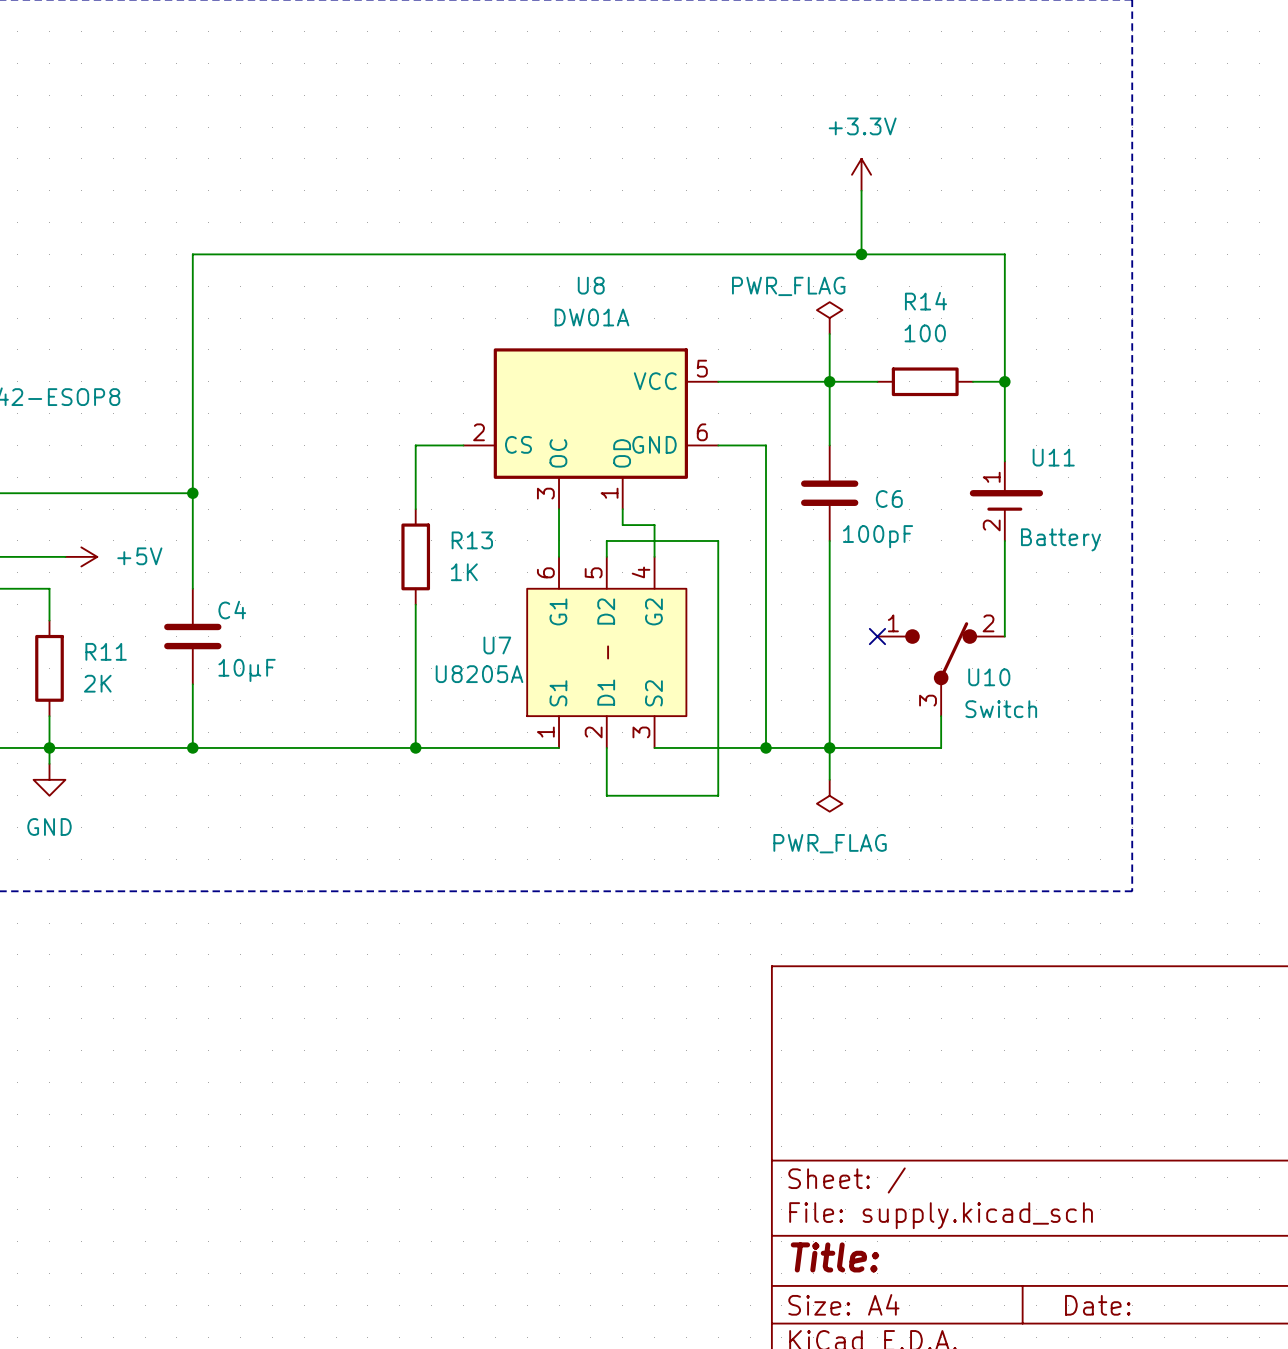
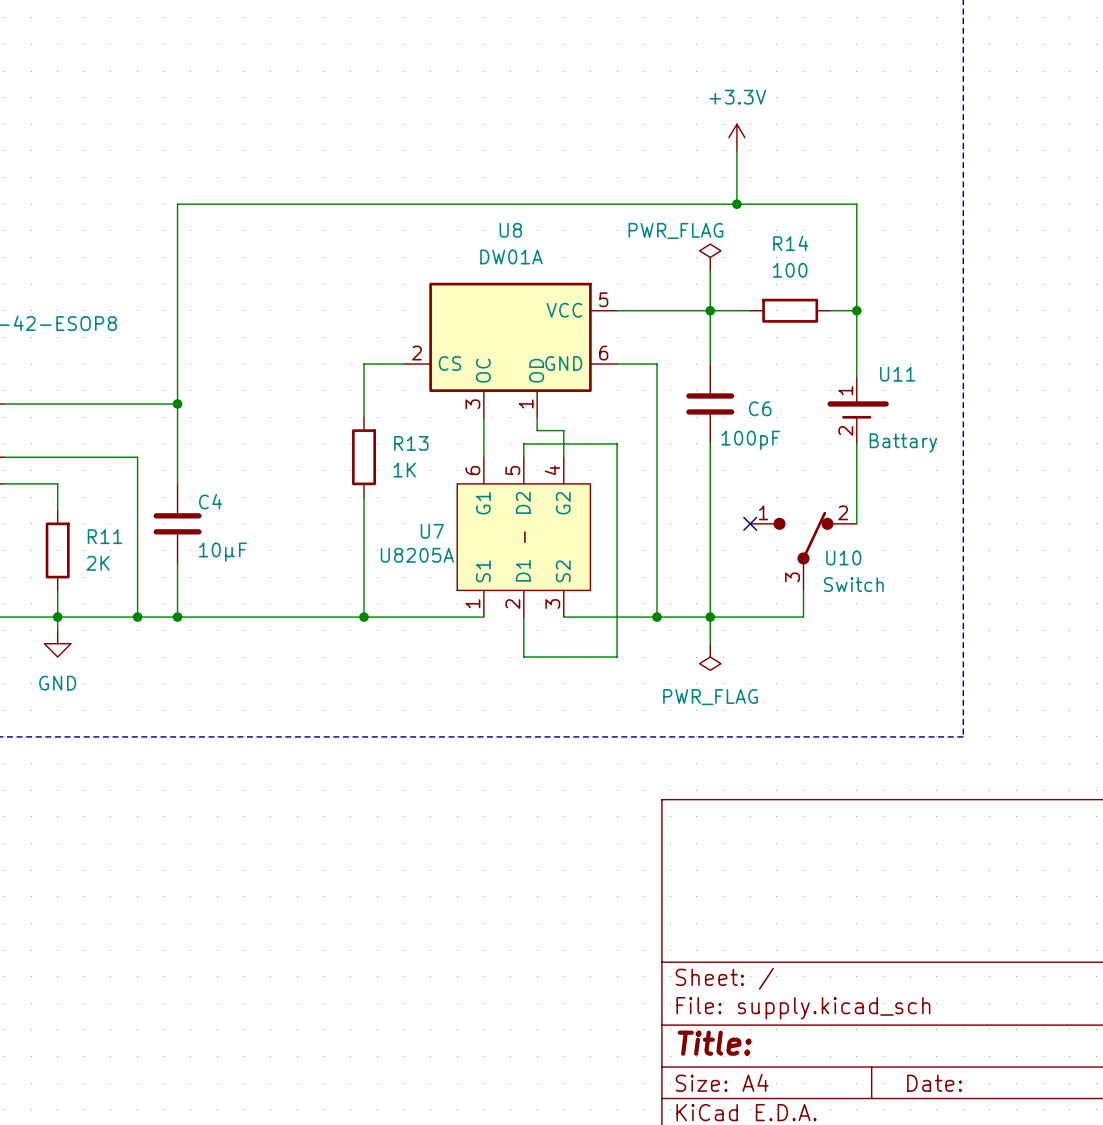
U11 value: Battery (1060, 539) -> Battary (903, 442)
wire: none -> (71, 457) (137, 457) (137, 617)
power symbol: +5V (81, 556) -> none
junction: none -> (137, 617)

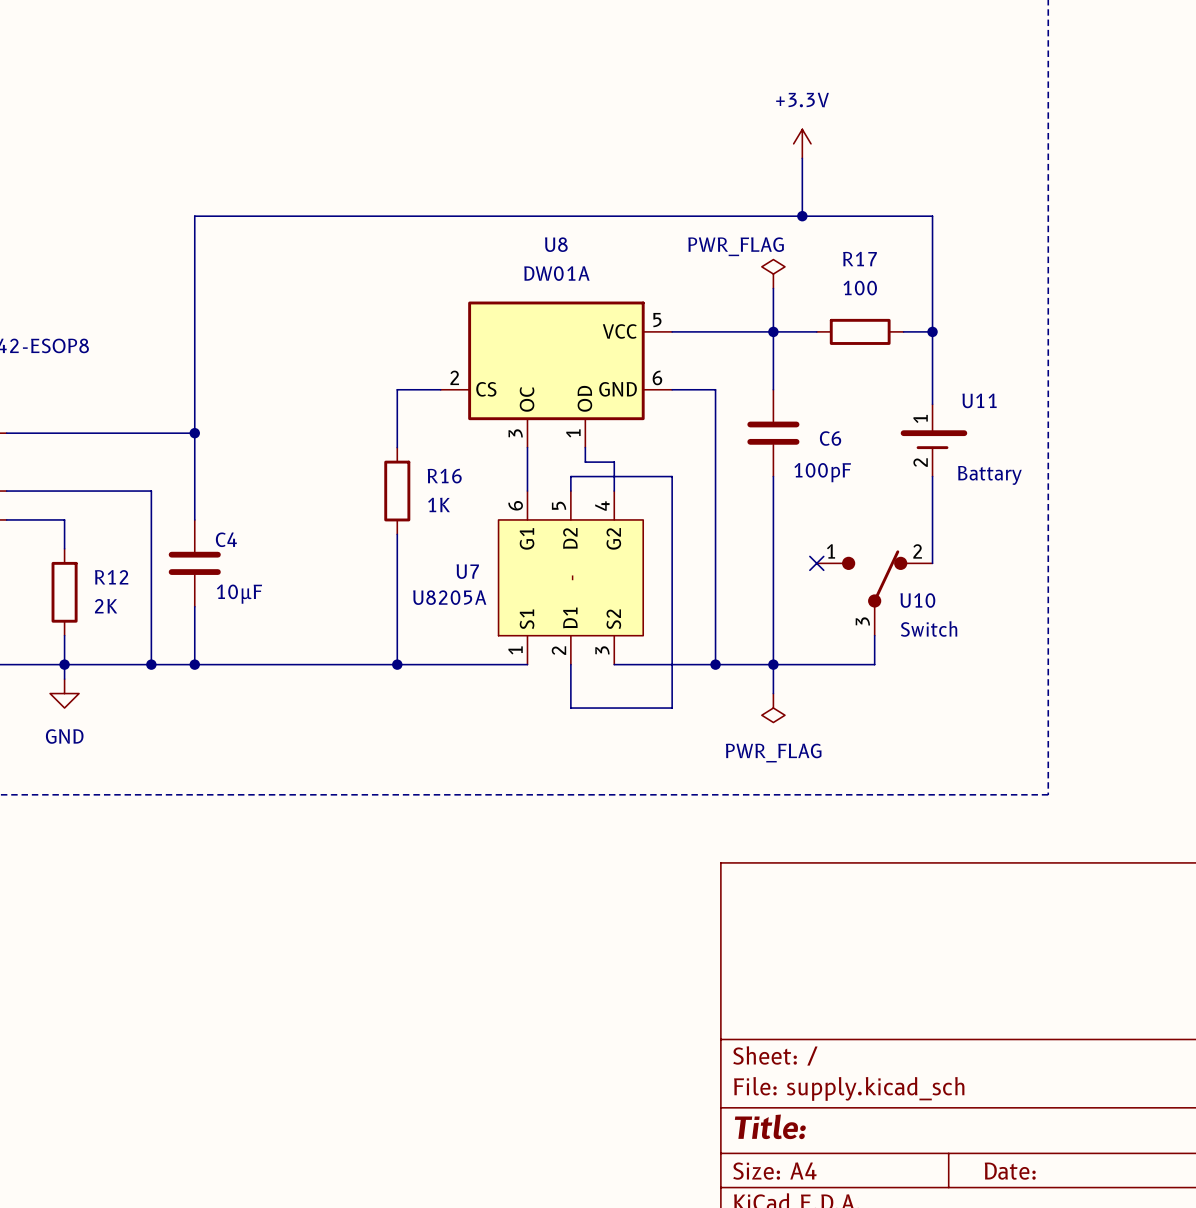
R14 name: R14 (790, 243) -> R17 (859, 259)
R13 name: R13 (411, 443) -> R16 (444, 476)
R11 name: R11 (105, 536) -> R12 (111, 577)

